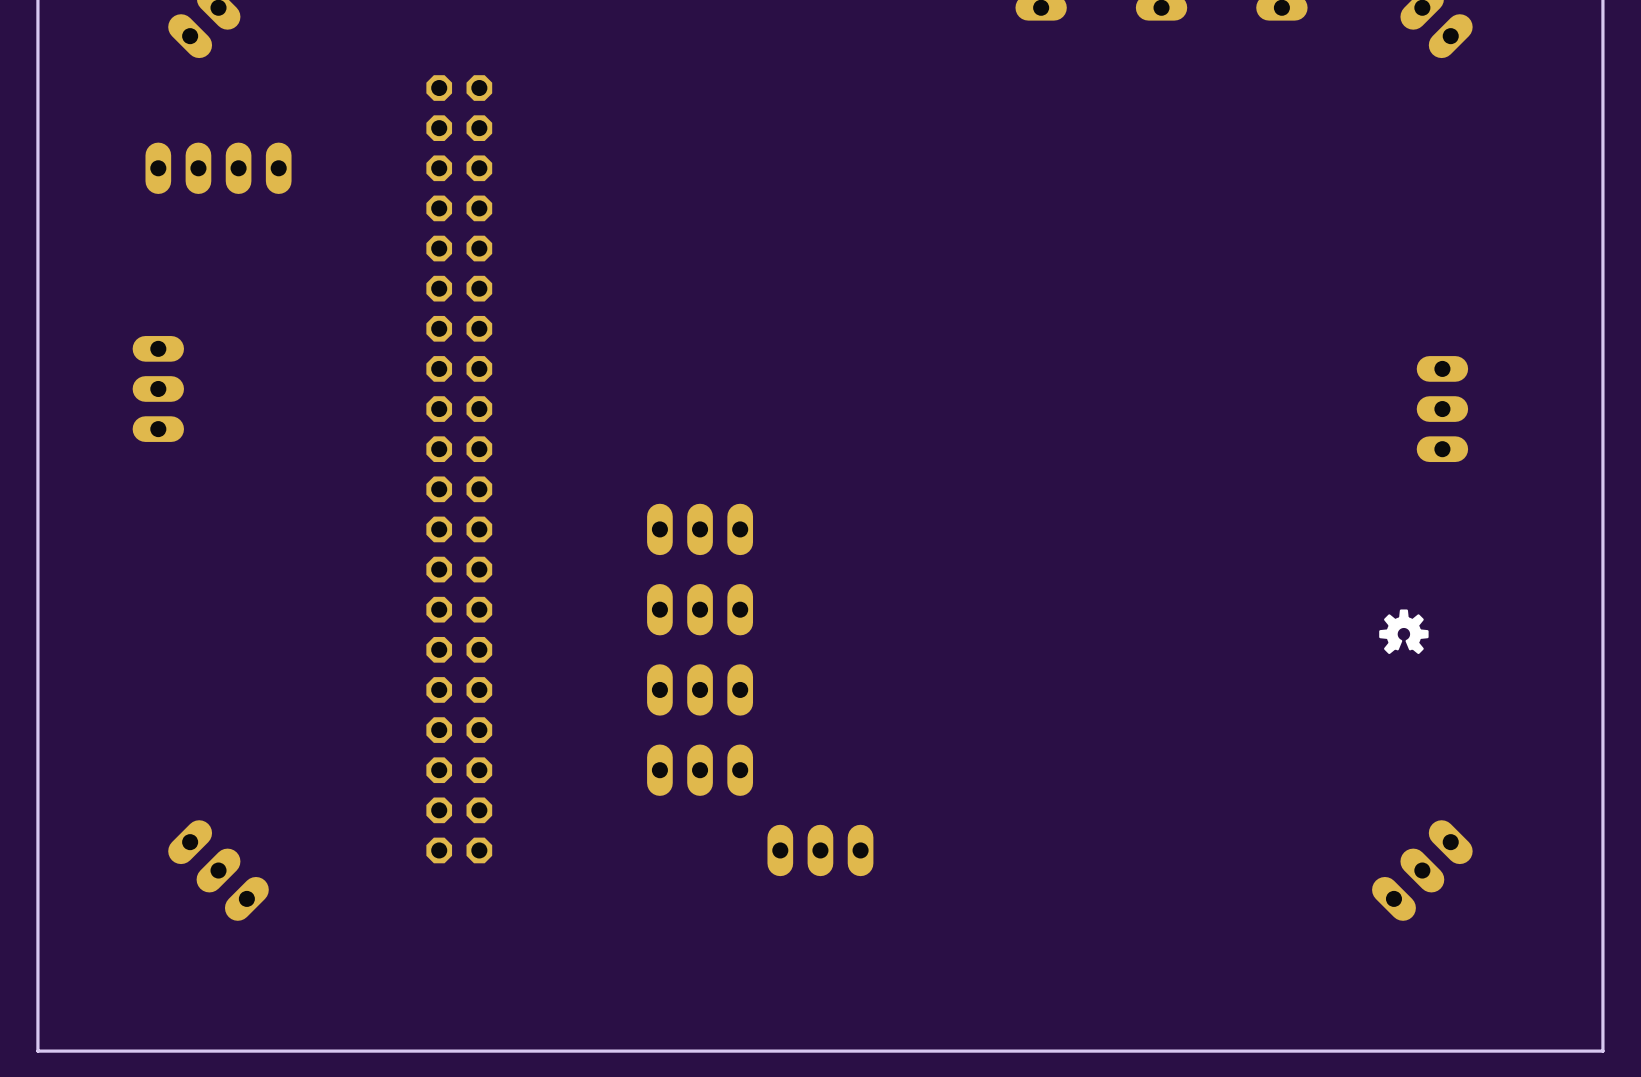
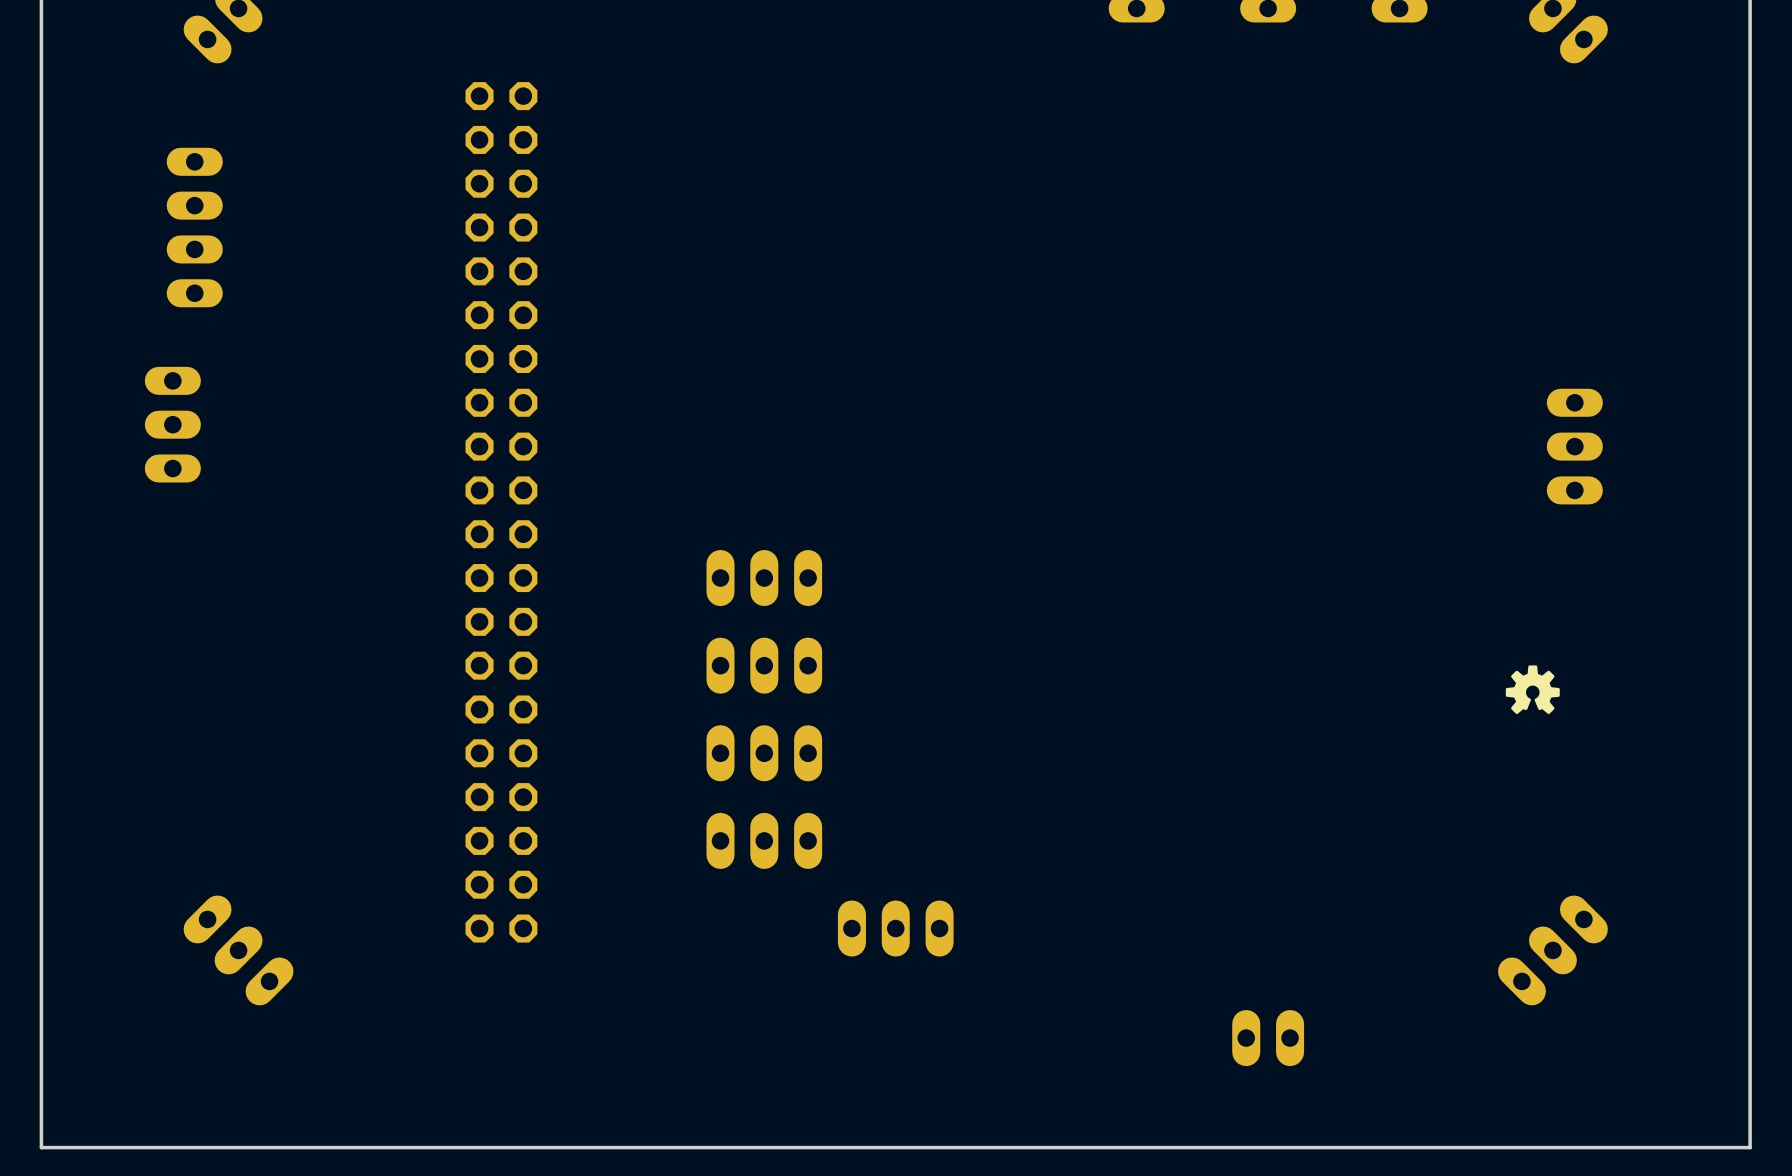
part rotation: 0° (218, 168) -> 90° clockwise (194, 227)
part: none -> (1268, 1038)

